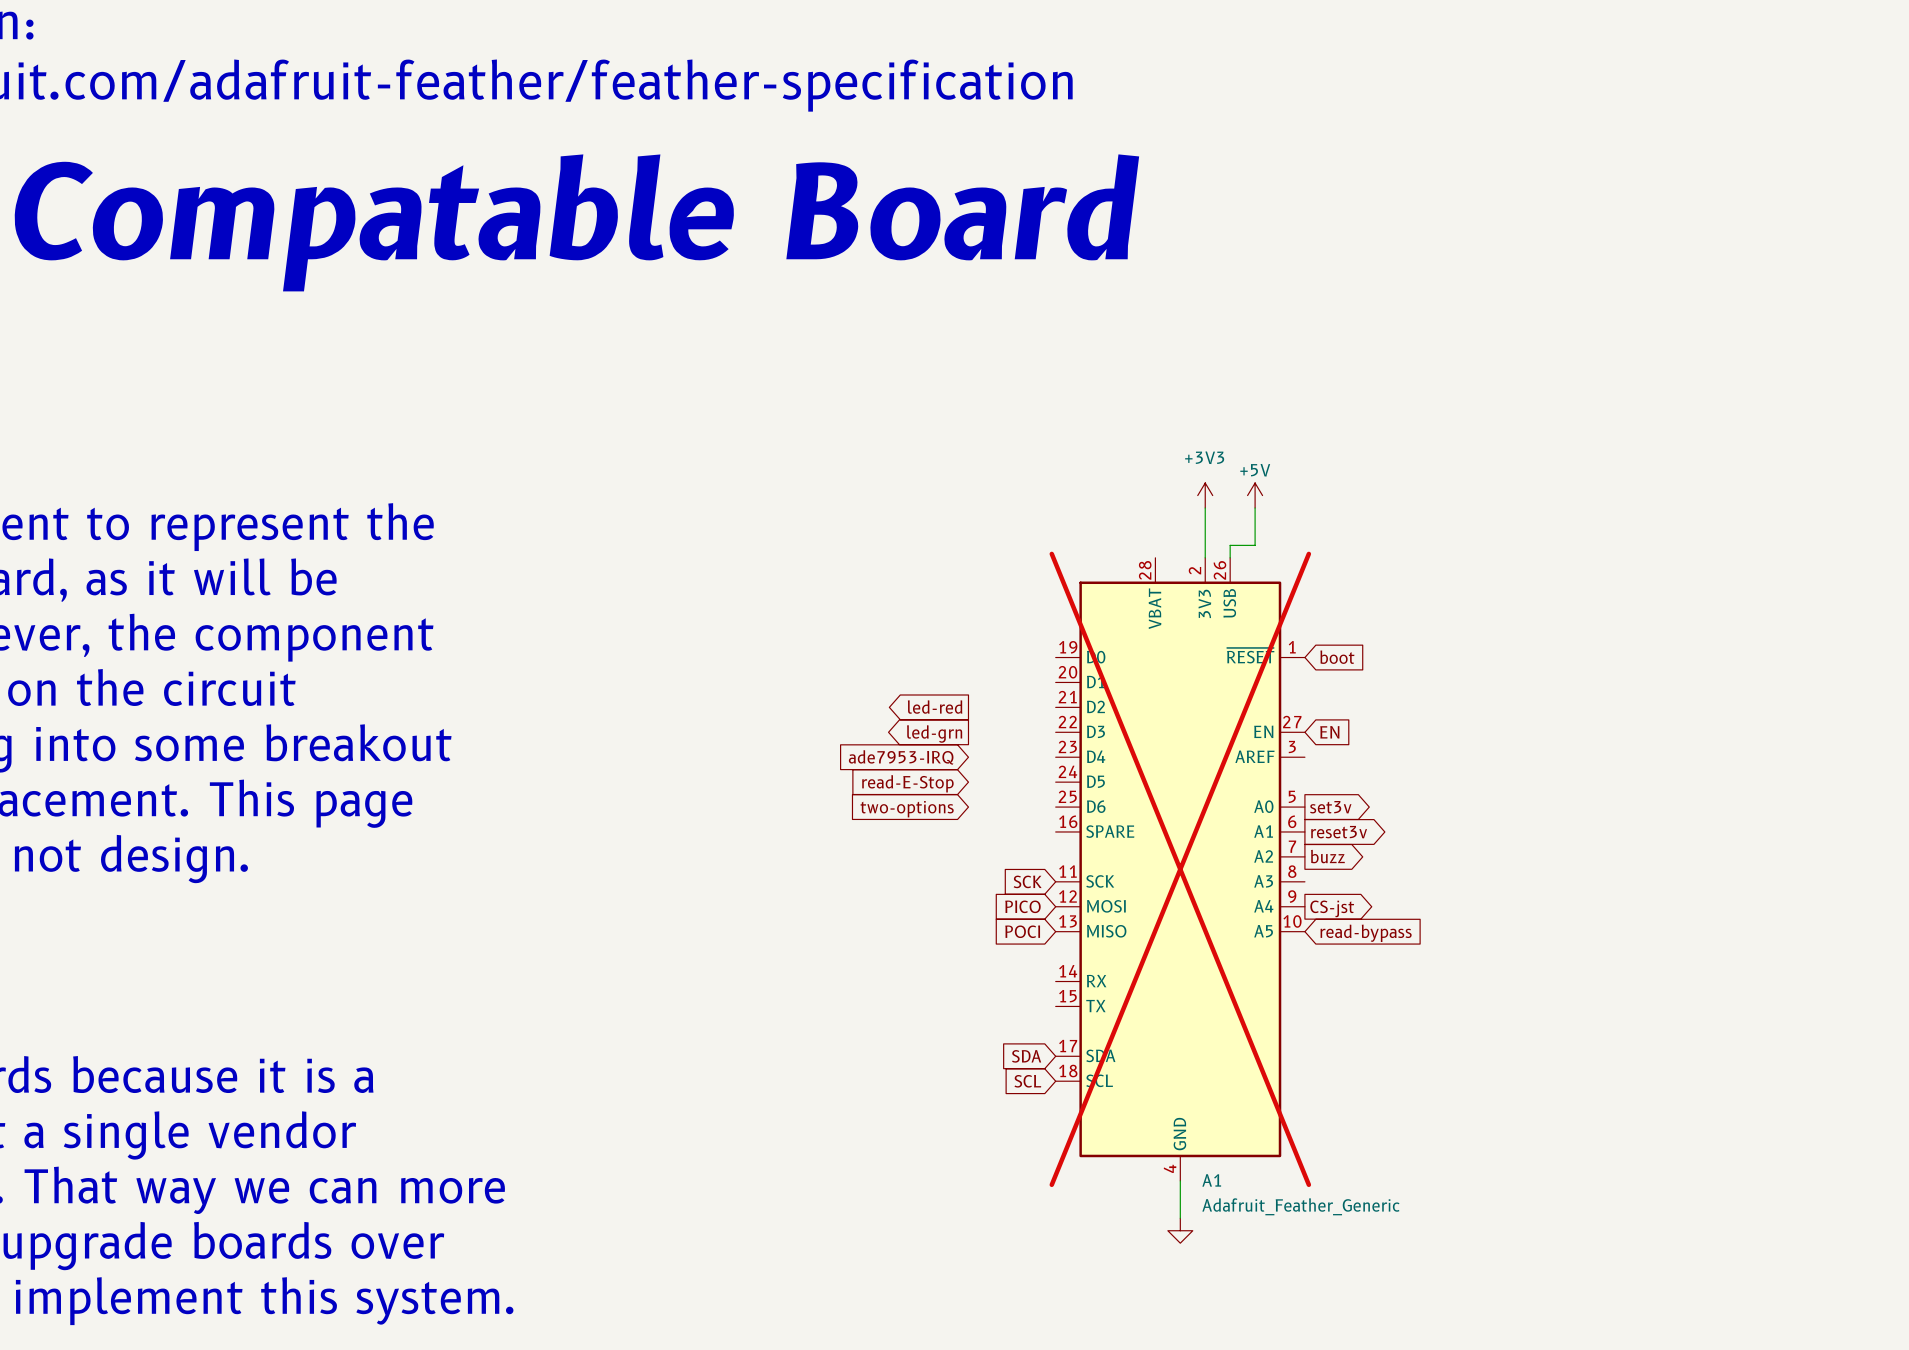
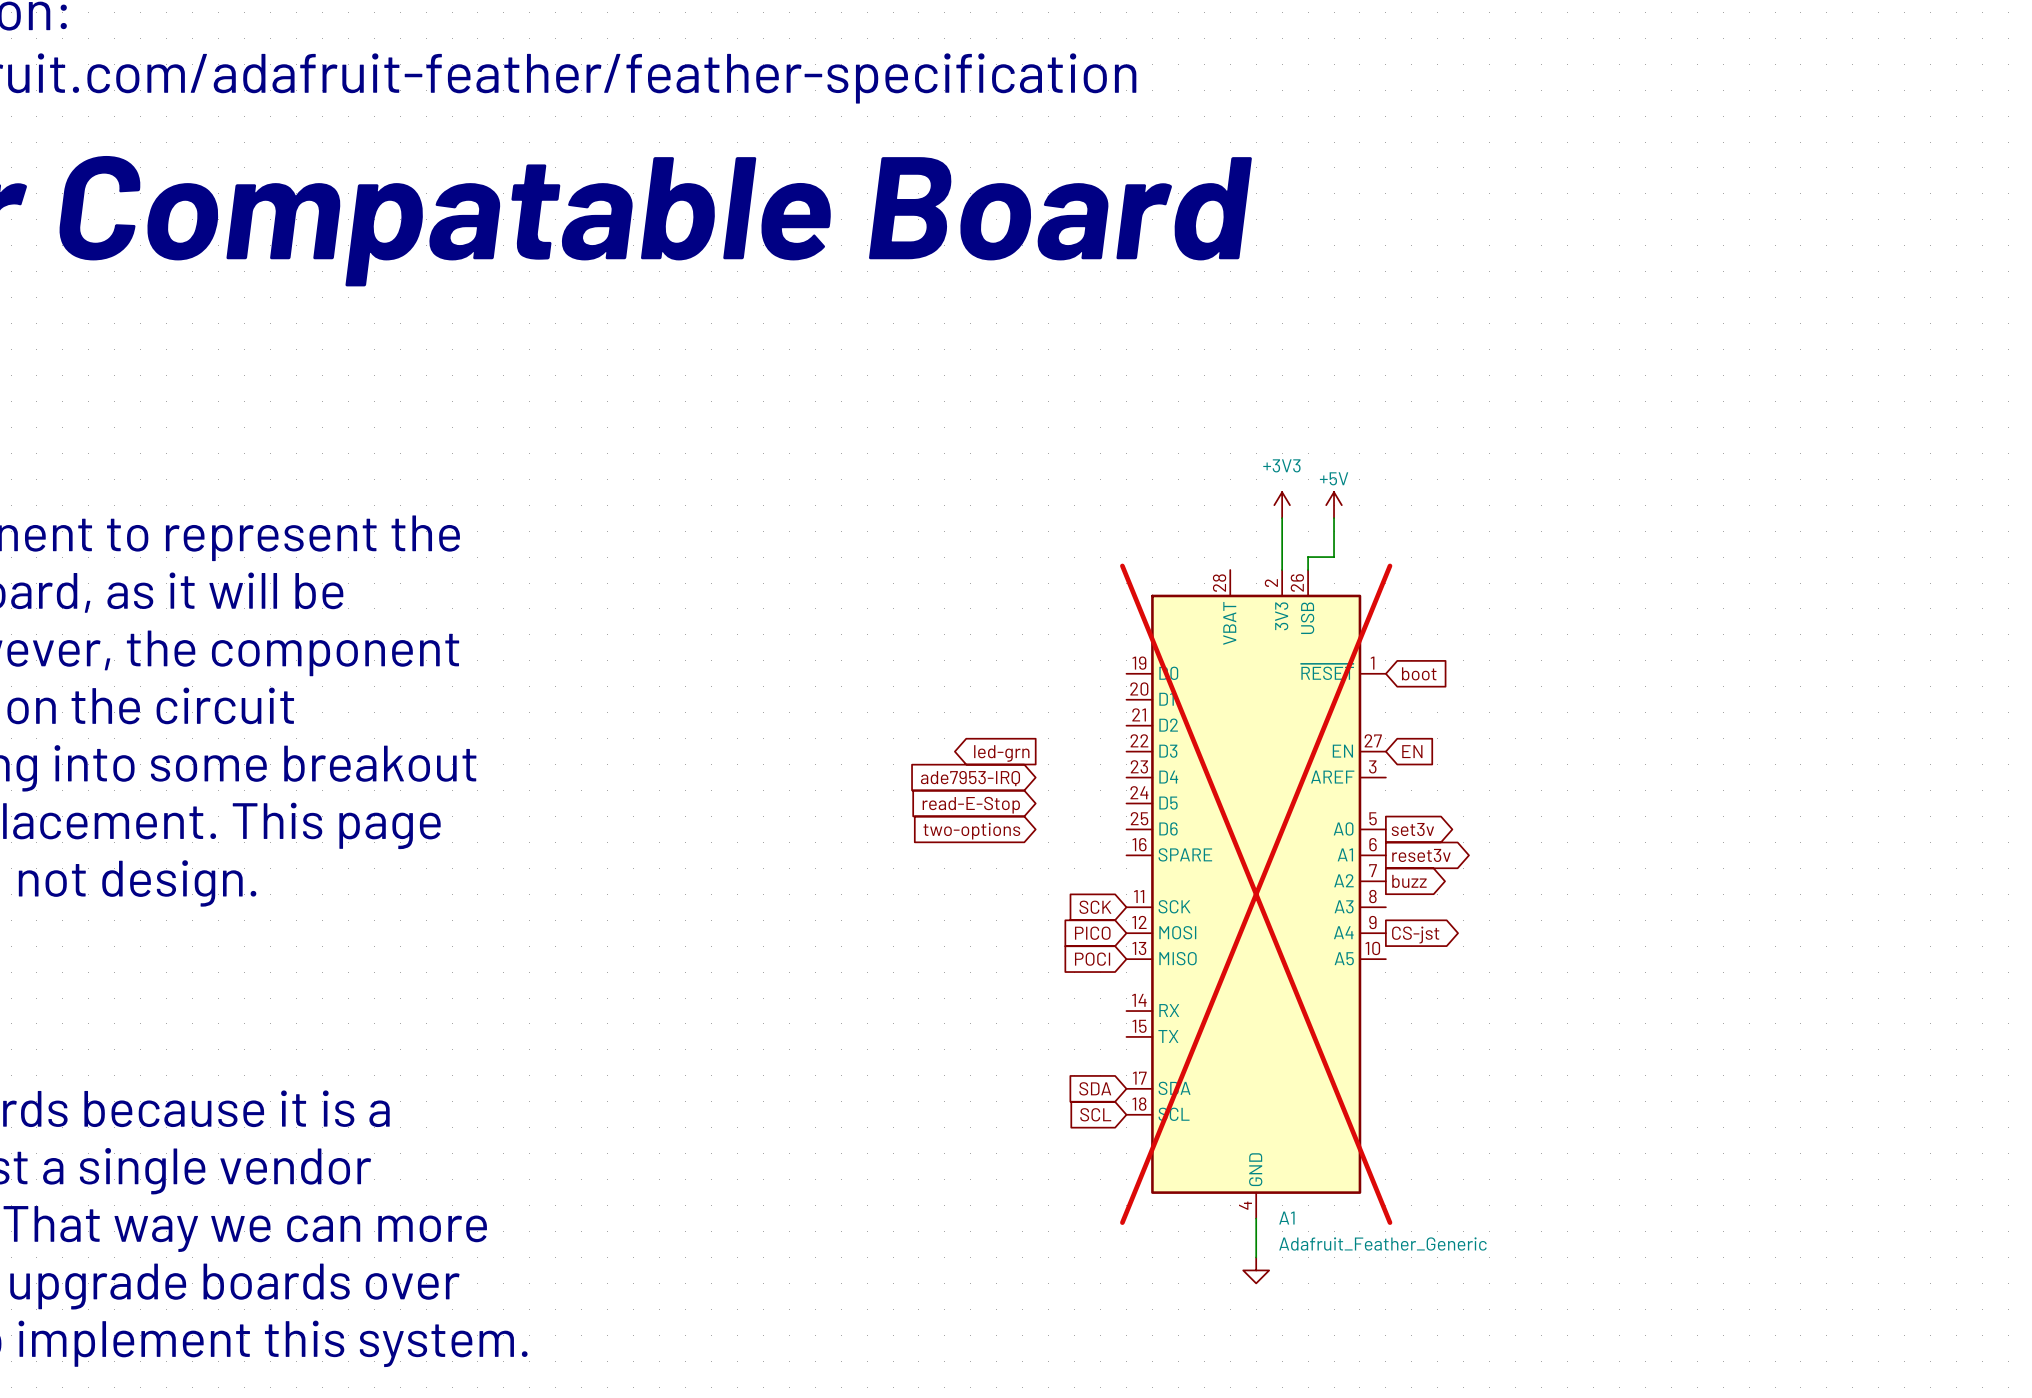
global label: led-red (935, 707) -> none
global label: read-bypass (1366, 933) -> none

